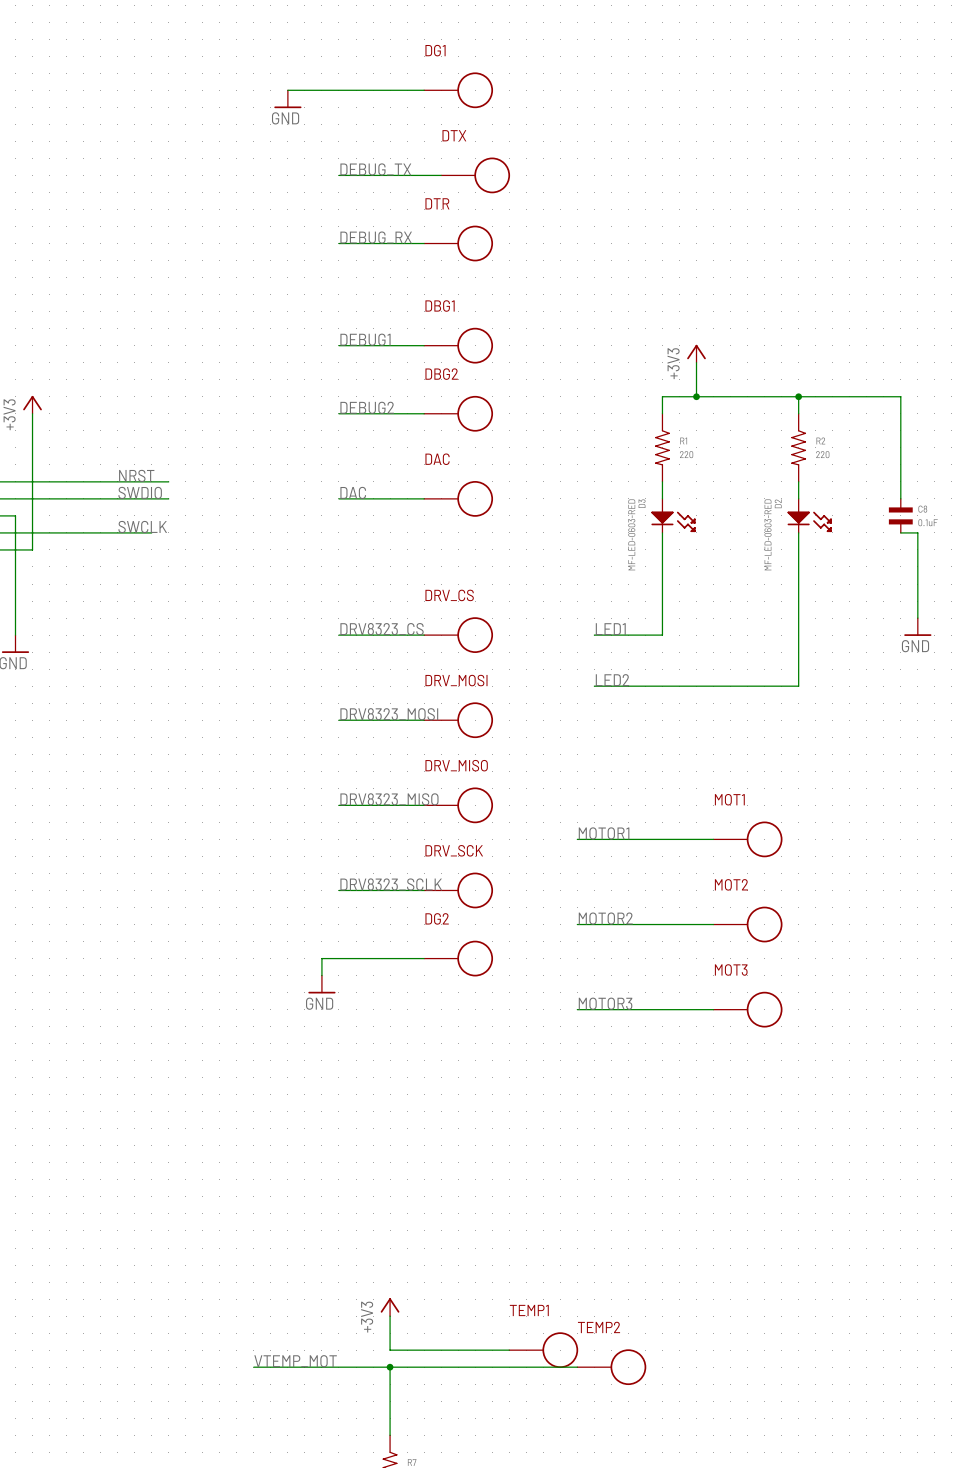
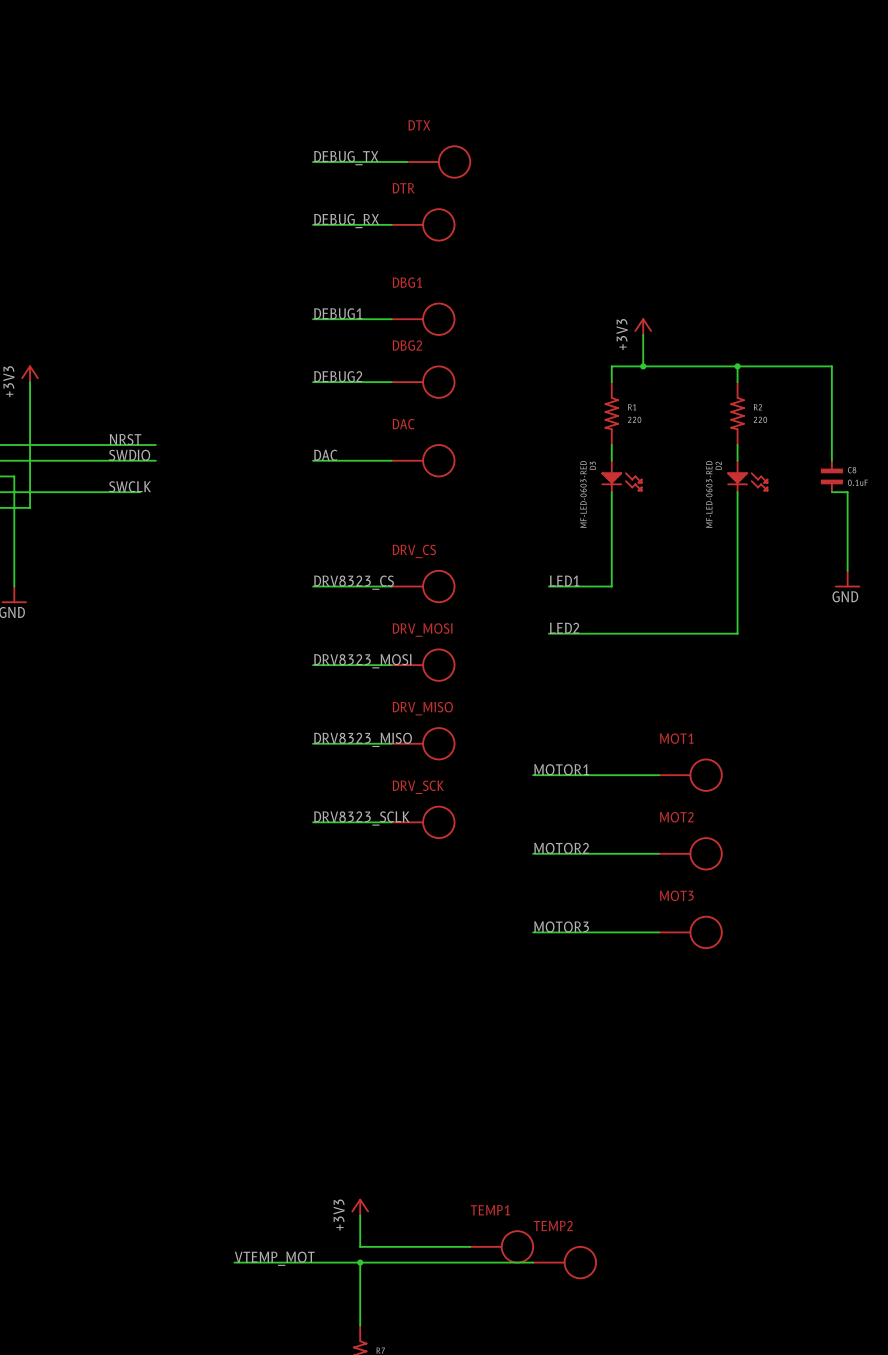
wire: (287, 90) (424, 90) -> none
DG1: (458, 90) -> none
power symbol: GND (287, 99) -> none
wire: (424, 958) (321, 958) (321, 975) -> none
DG2: (458, 958) -> none
power symbol: GND (321, 984) -> none

